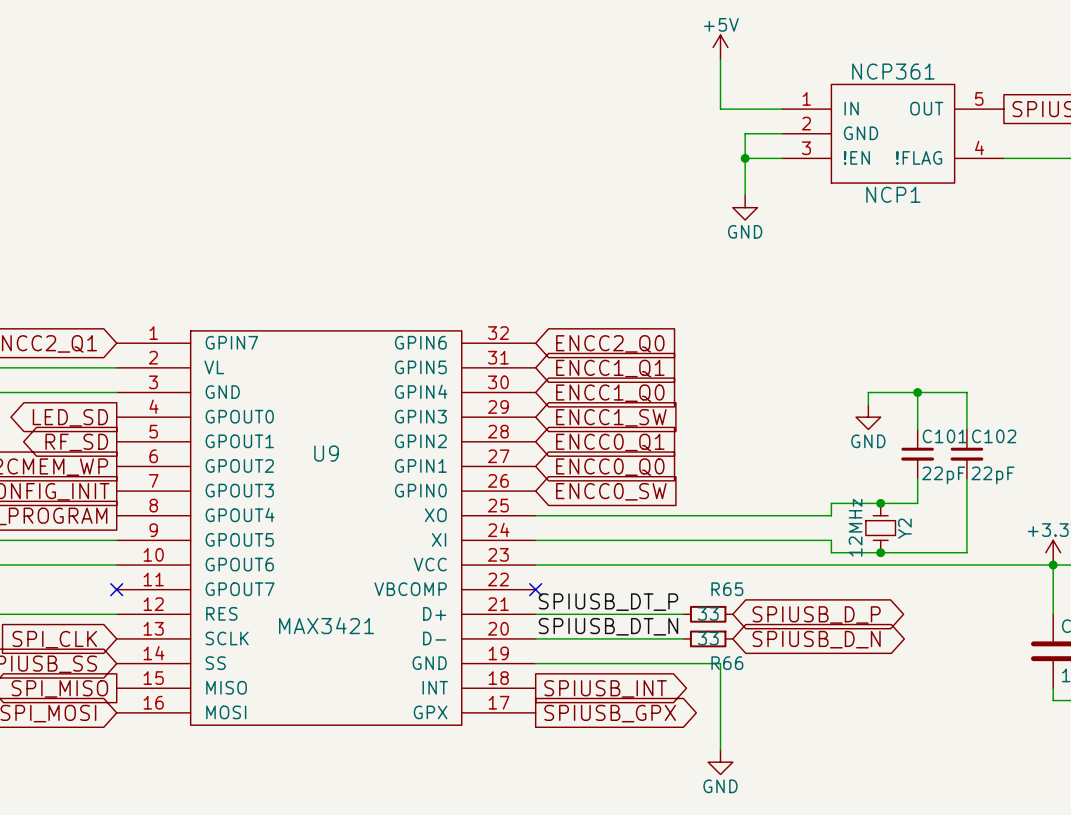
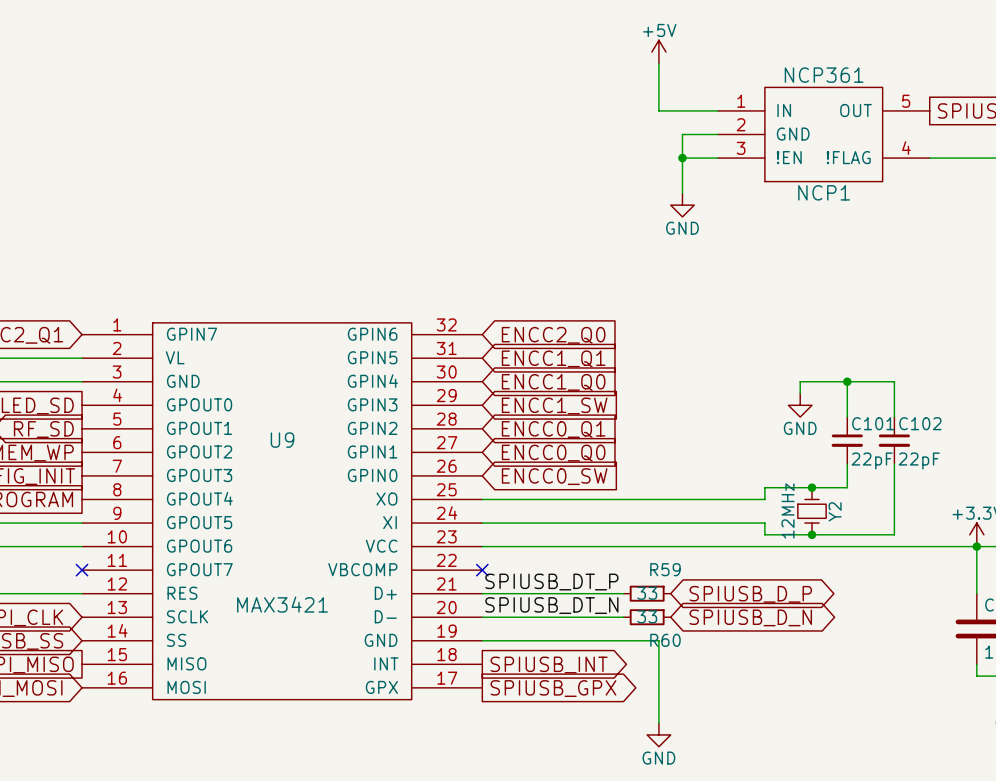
R65 name: R65 (727, 589) -> R59 (665, 569)
R66 name: R66 (727, 663) -> R60 (665, 640)

